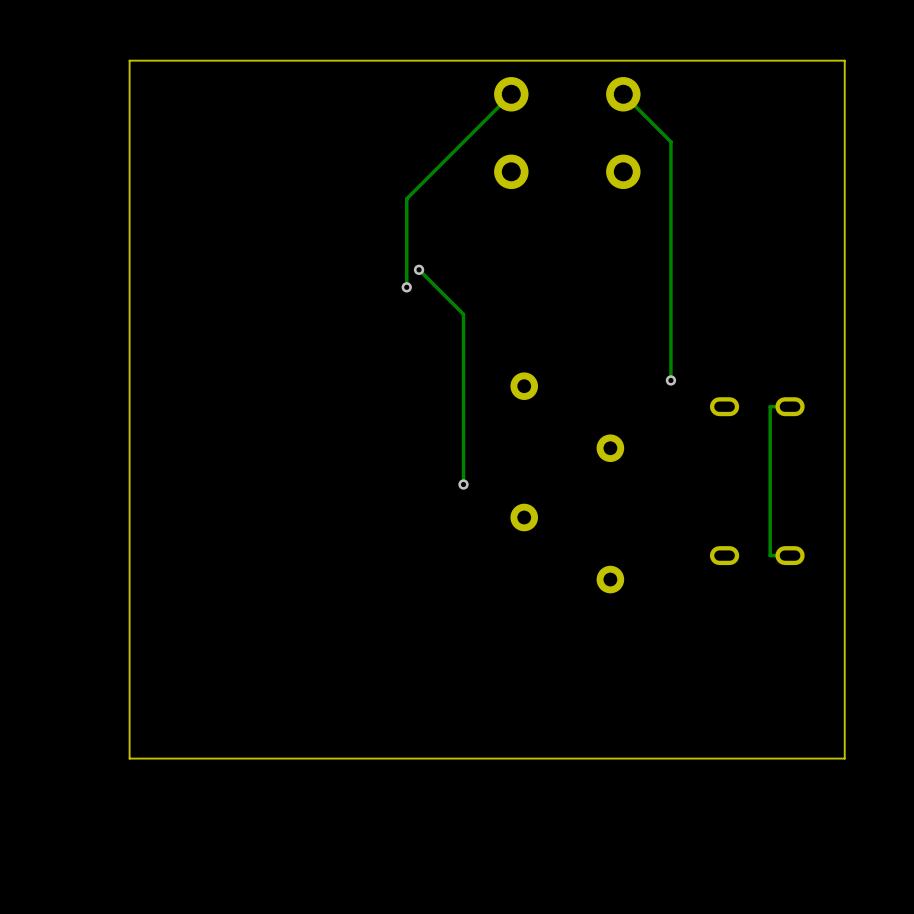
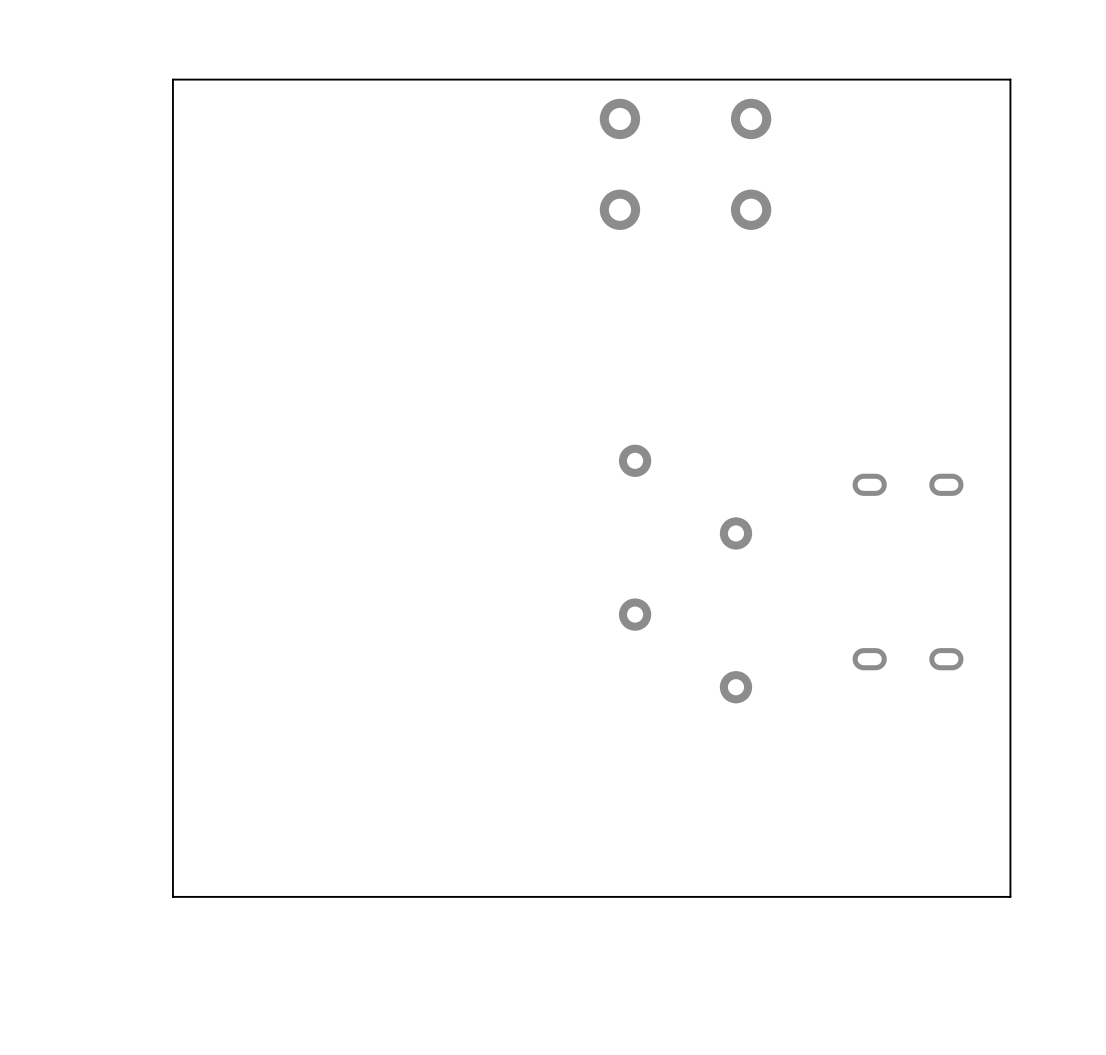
track: (511, 94) (406, 198) (406, 287) -> none
track: (623, 94) (670, 141) (670, 380) -> none
track: (419, 269) (463, 314) (463, 484) -> none
via: (419, 269) -> none
via: (406, 287) -> none
via: (670, 380) -> none
track: (790, 406) (770, 406) (770, 555) (790, 555) -> none
via: (463, 484) -> none

